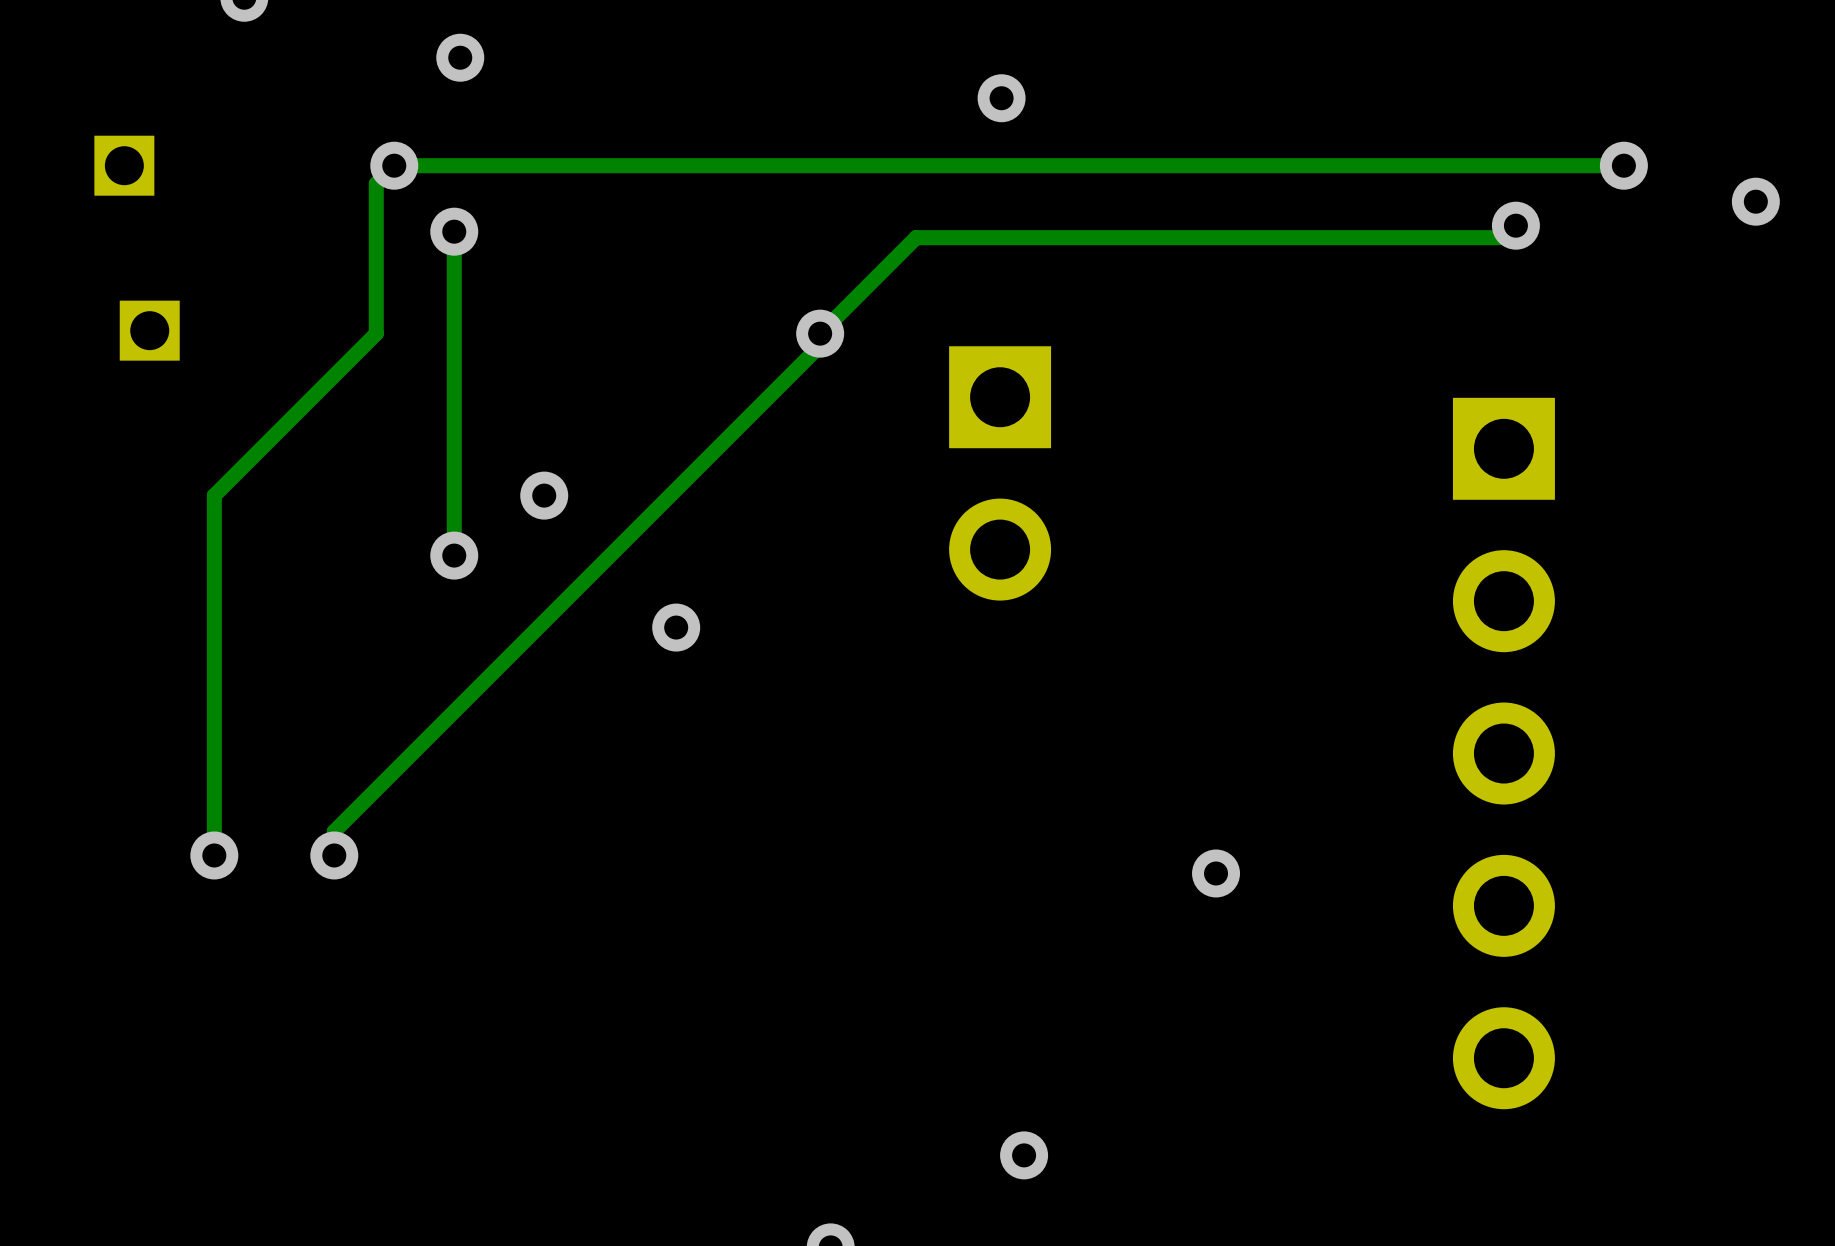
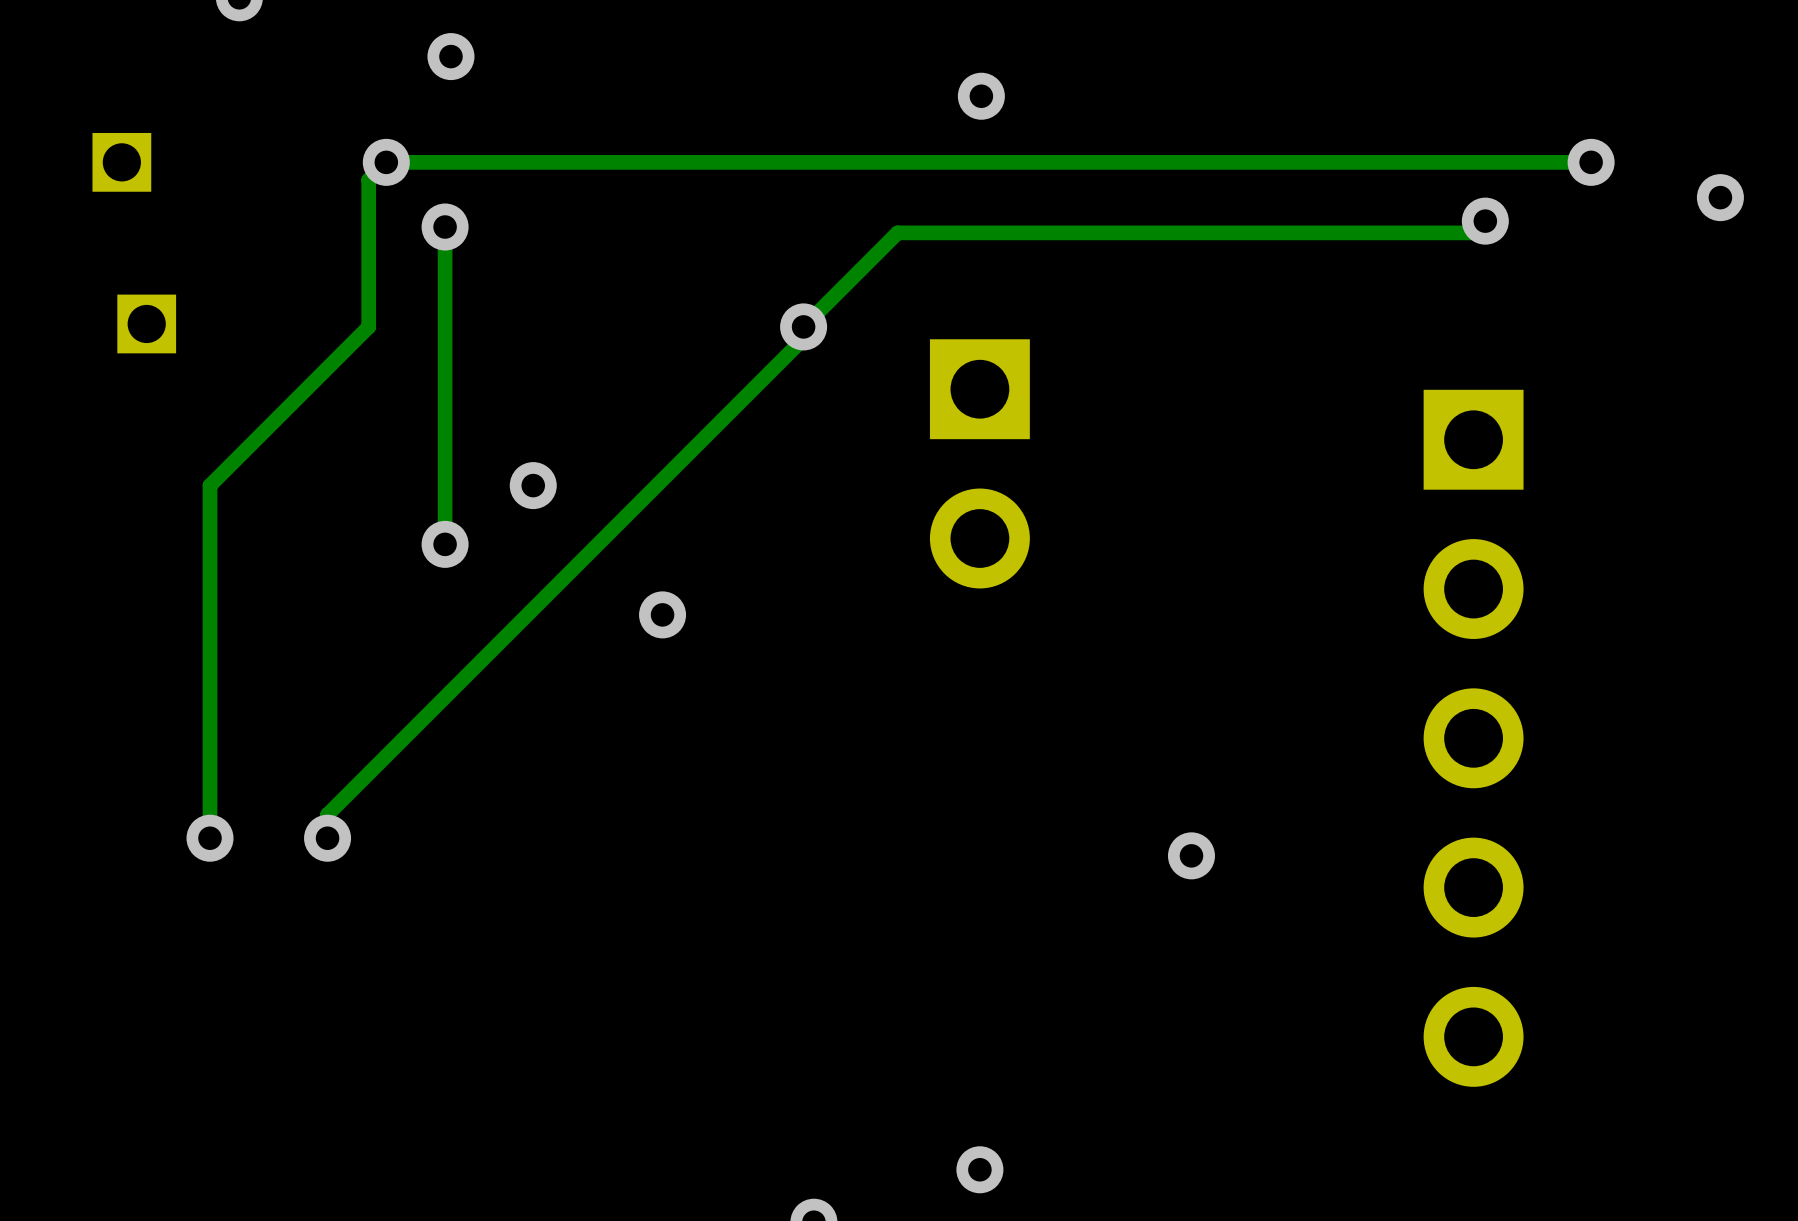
via position: (1024, 1155) -> (979, 1169)

